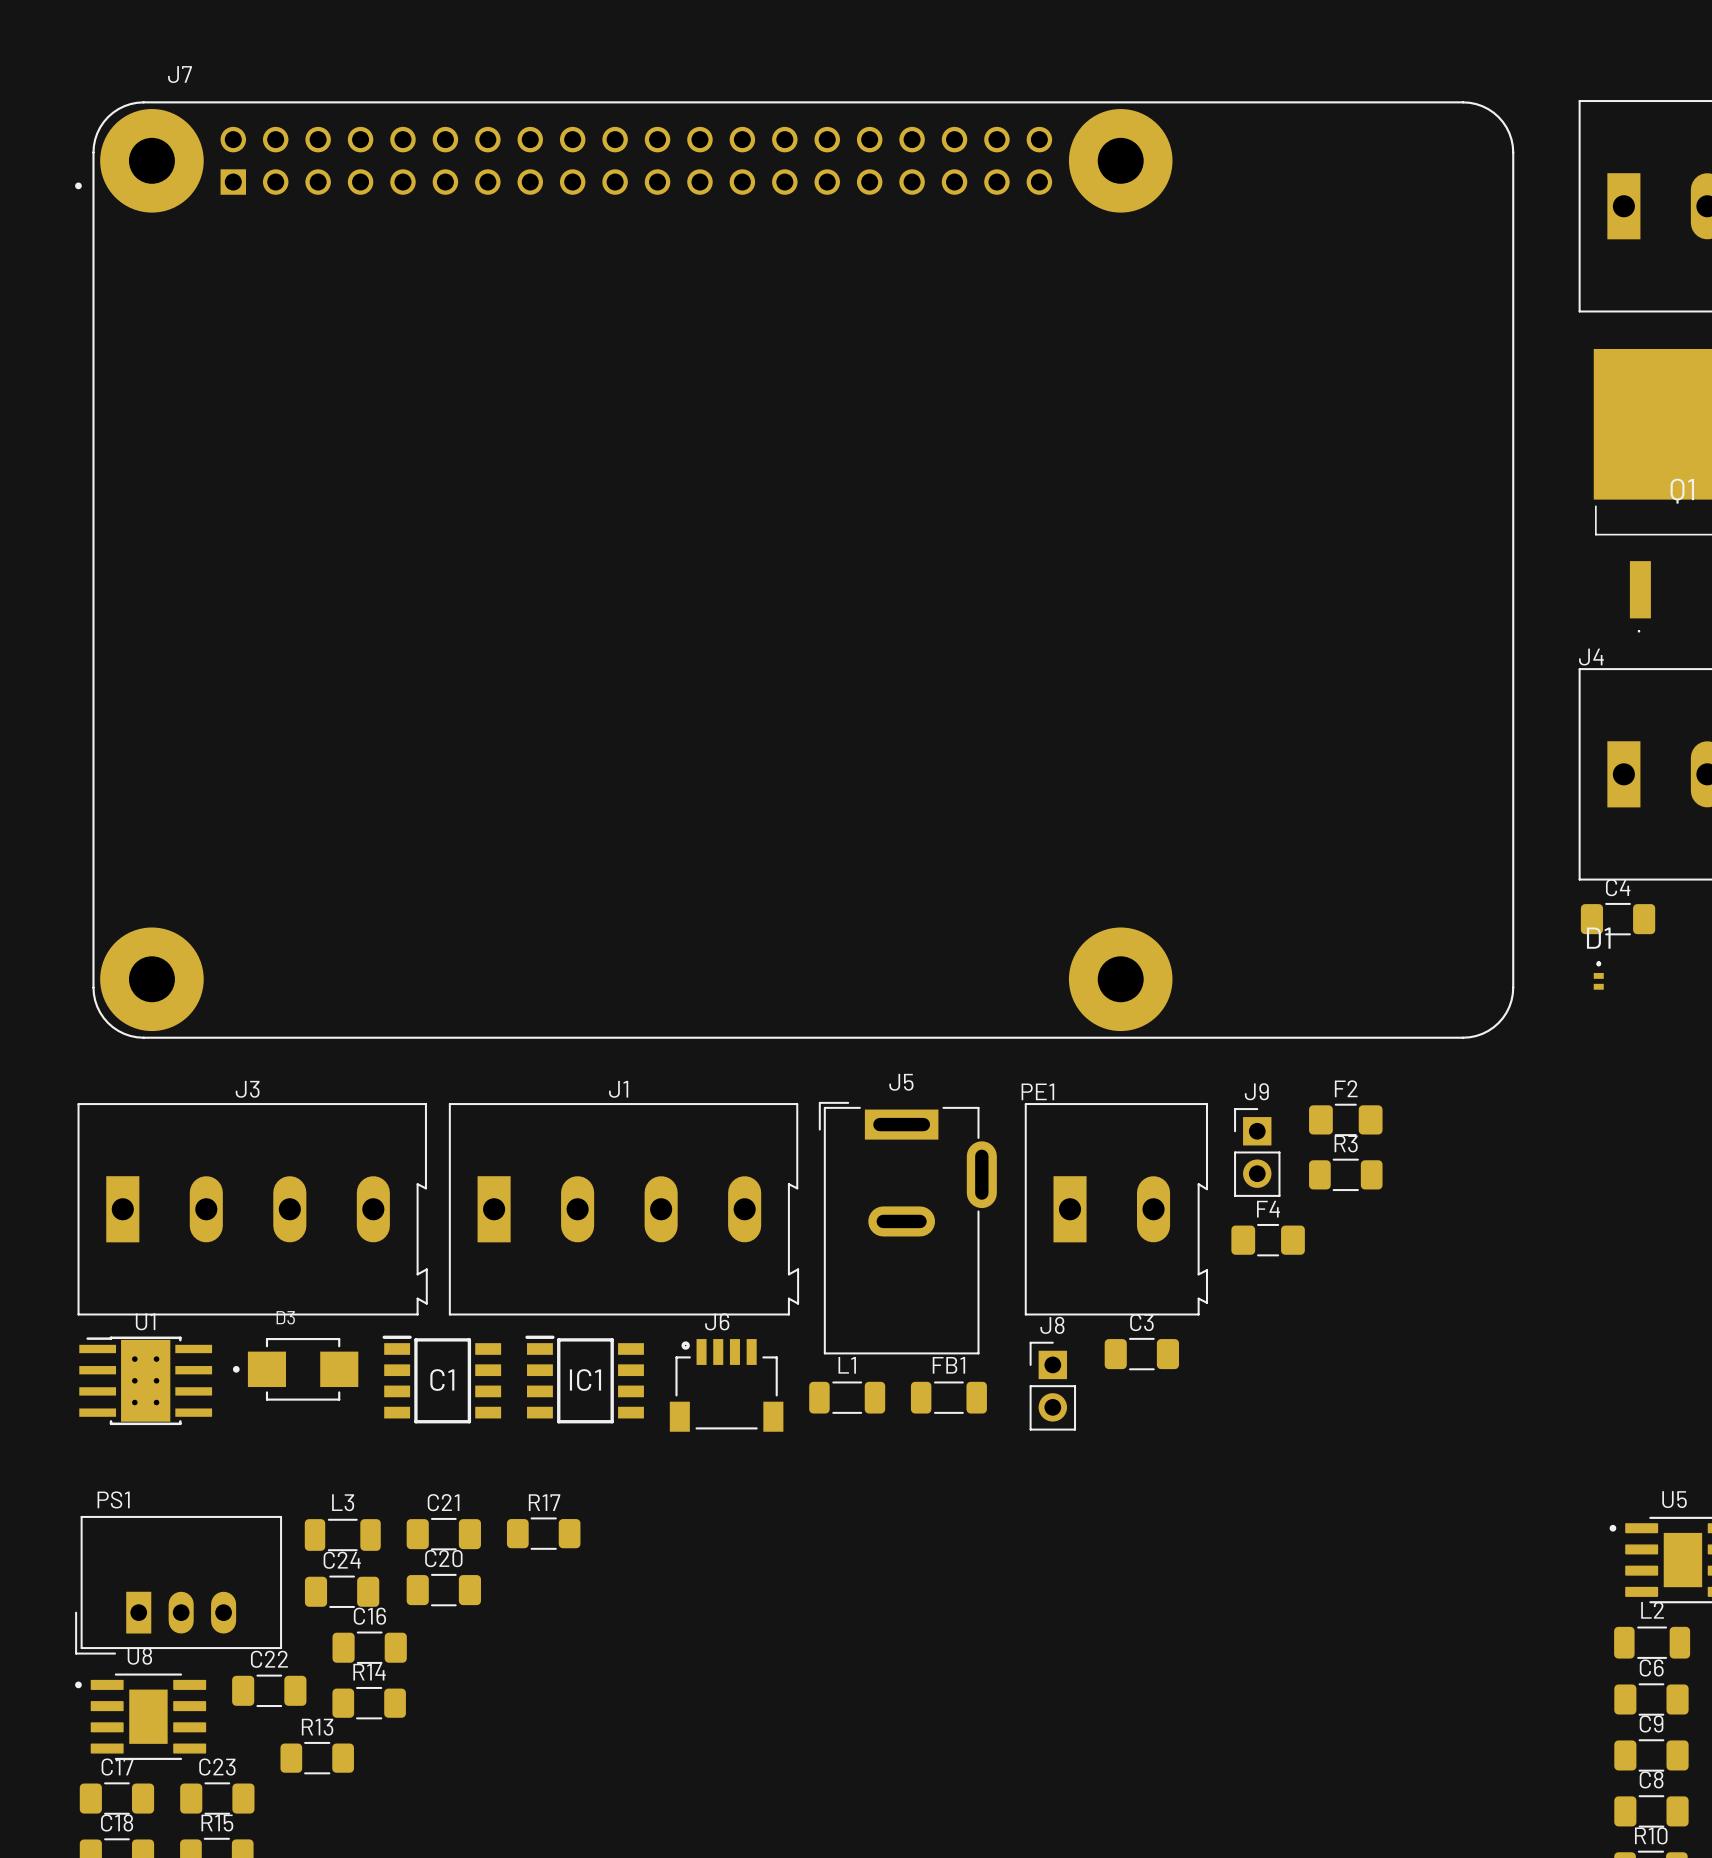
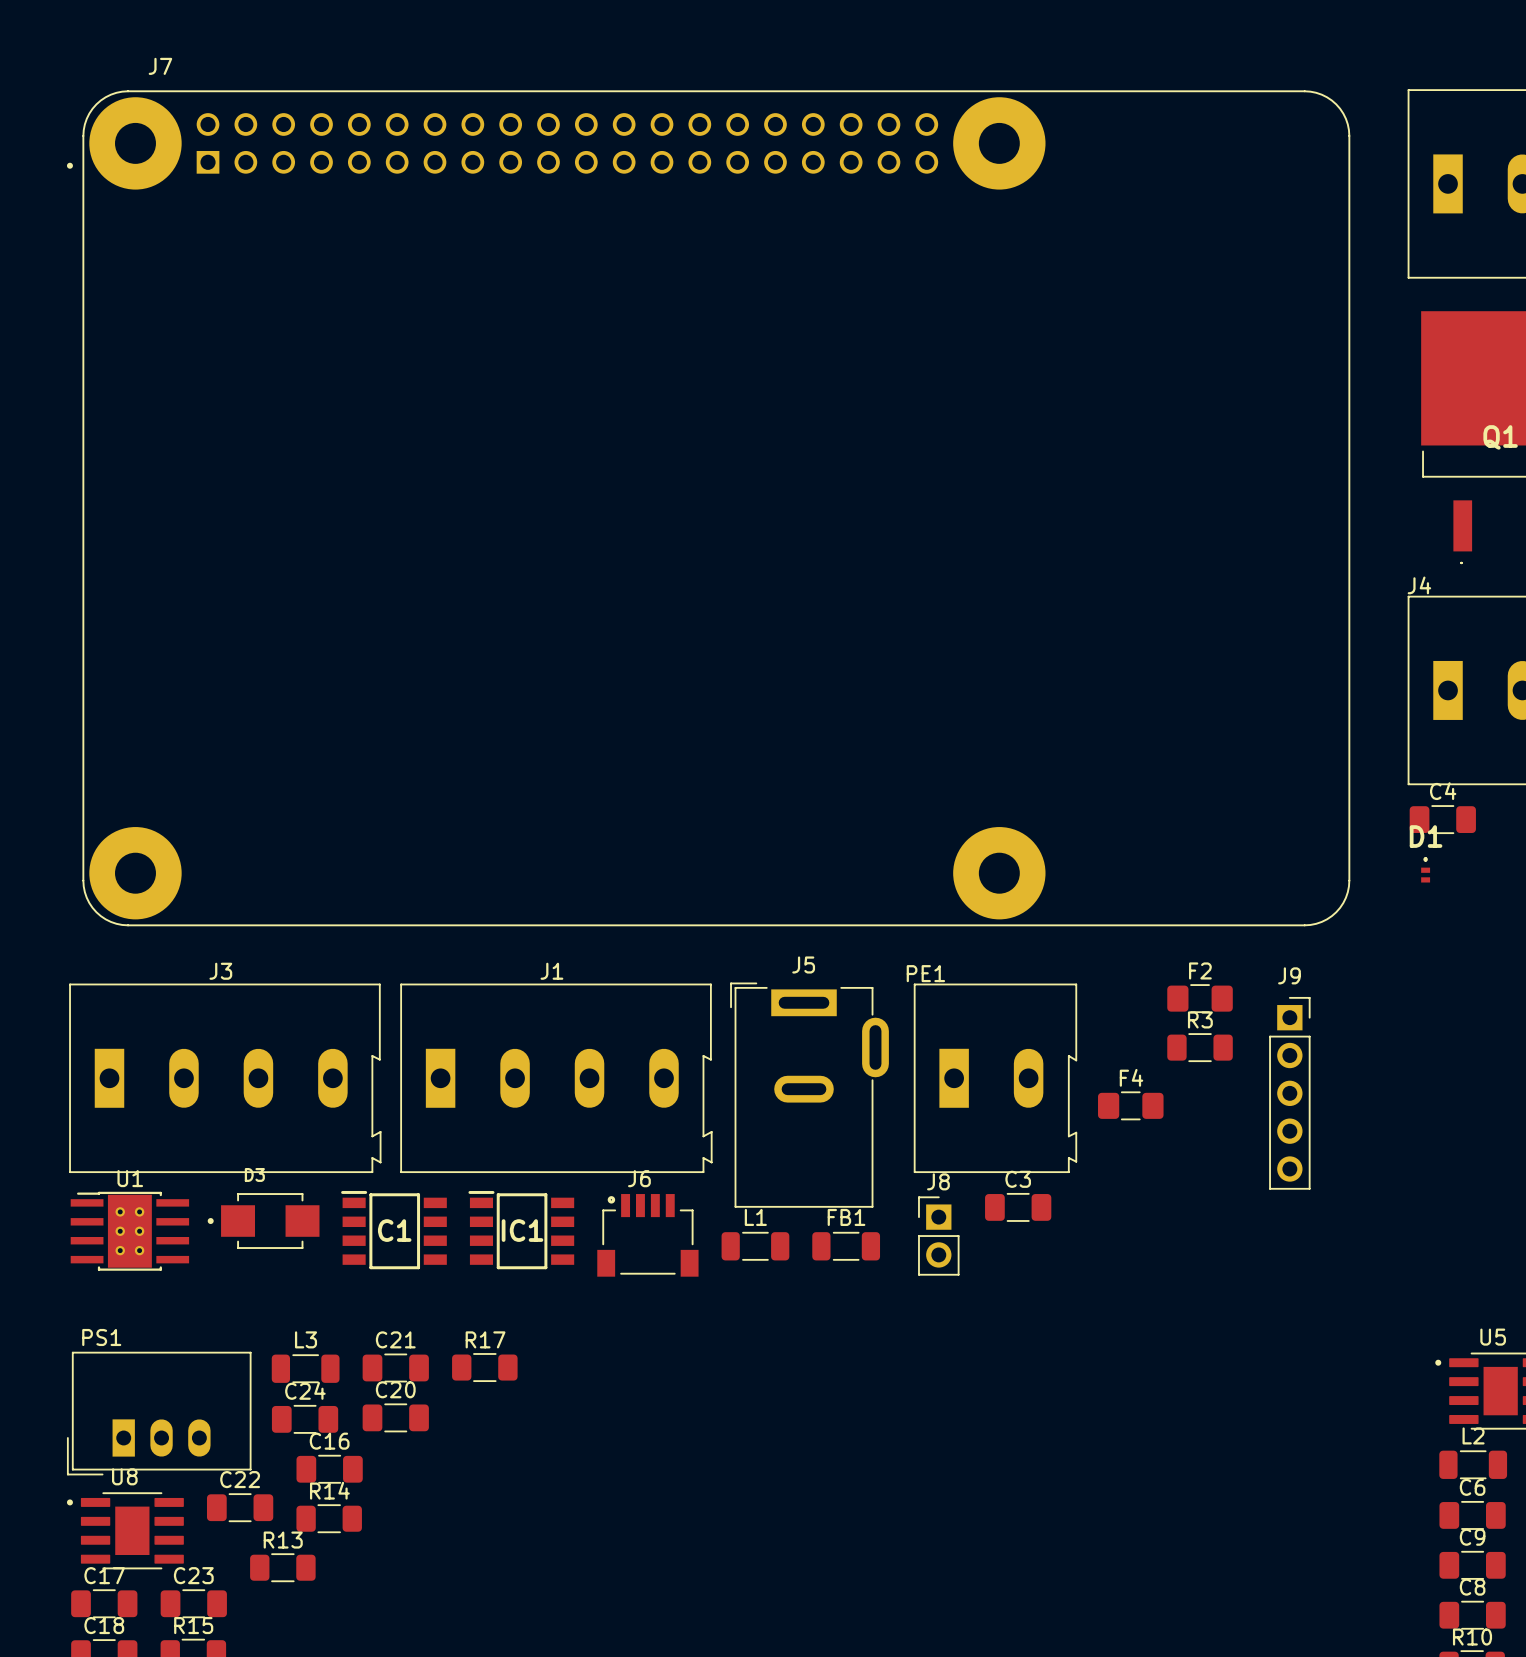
J9 name position: J9 (1256, 1091) -> J9 (1289, 975)
J9 footprint: [1234, 1108, 1281, 1197] -> [1269, 996, 1311, 1190]

